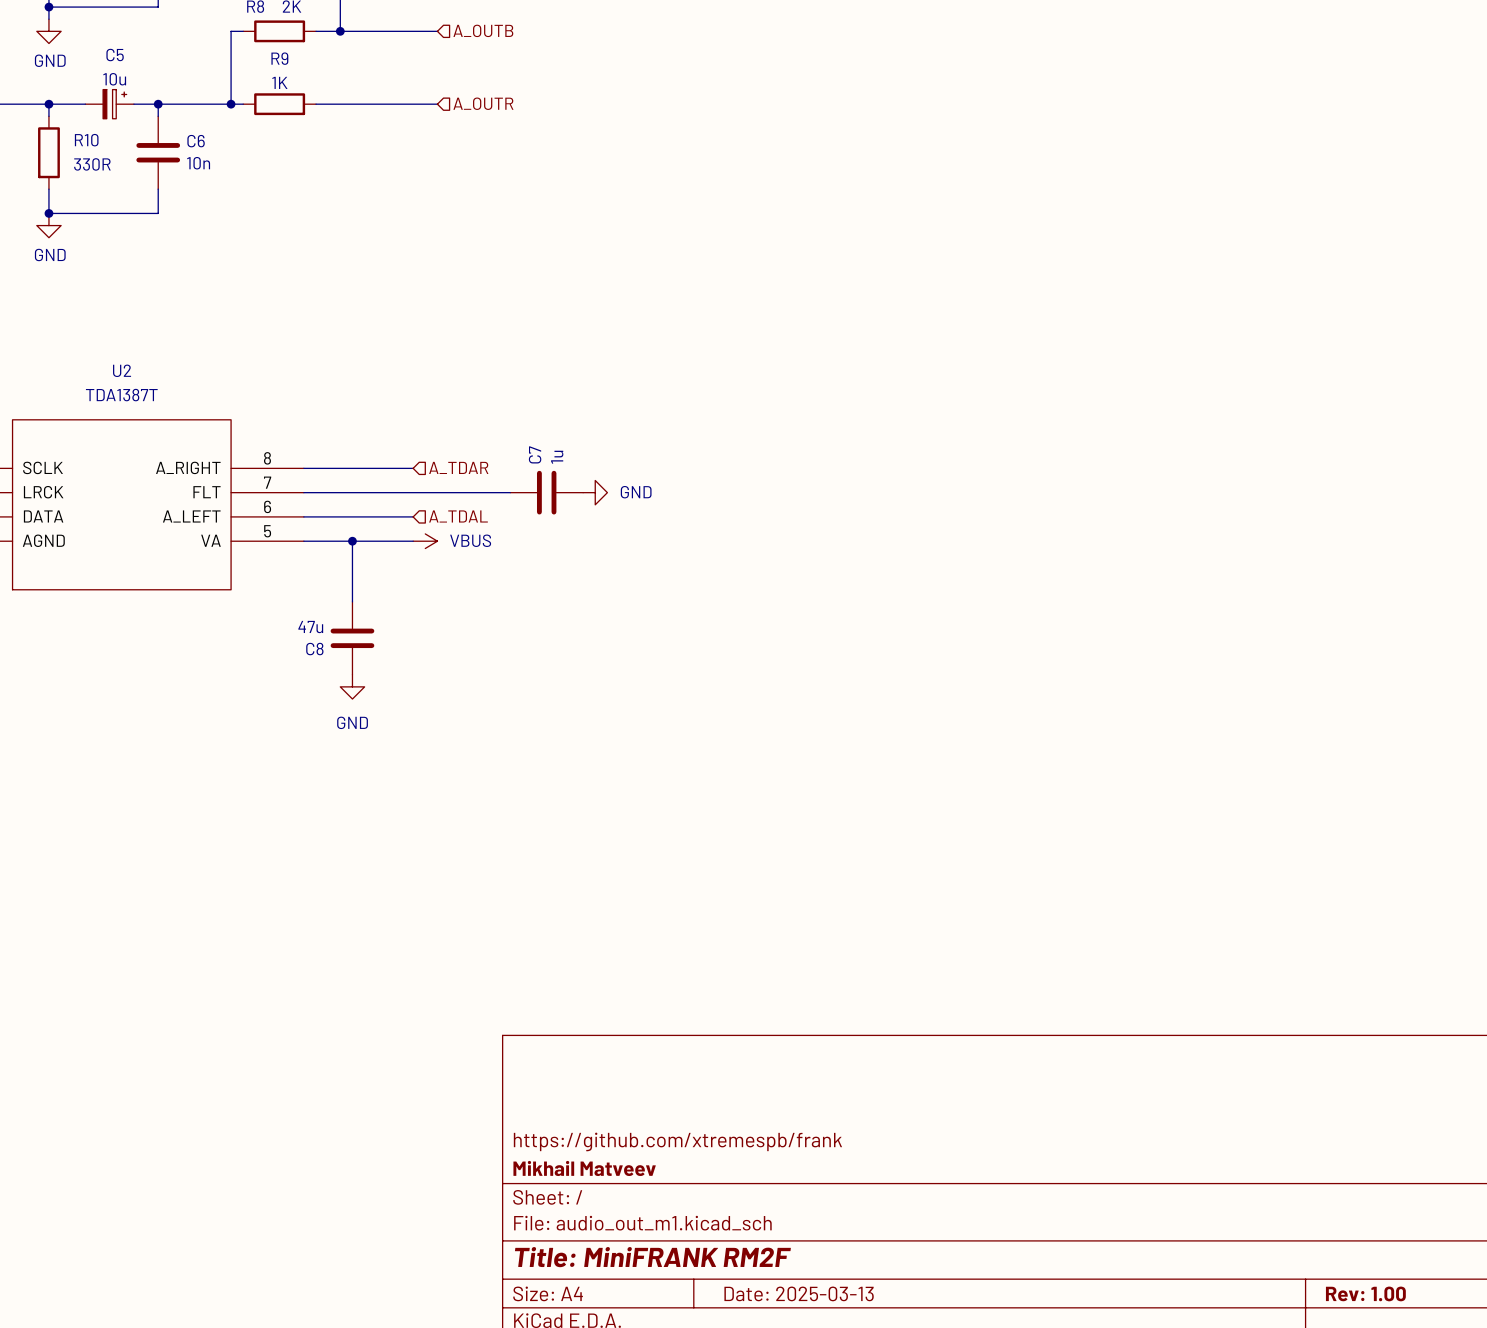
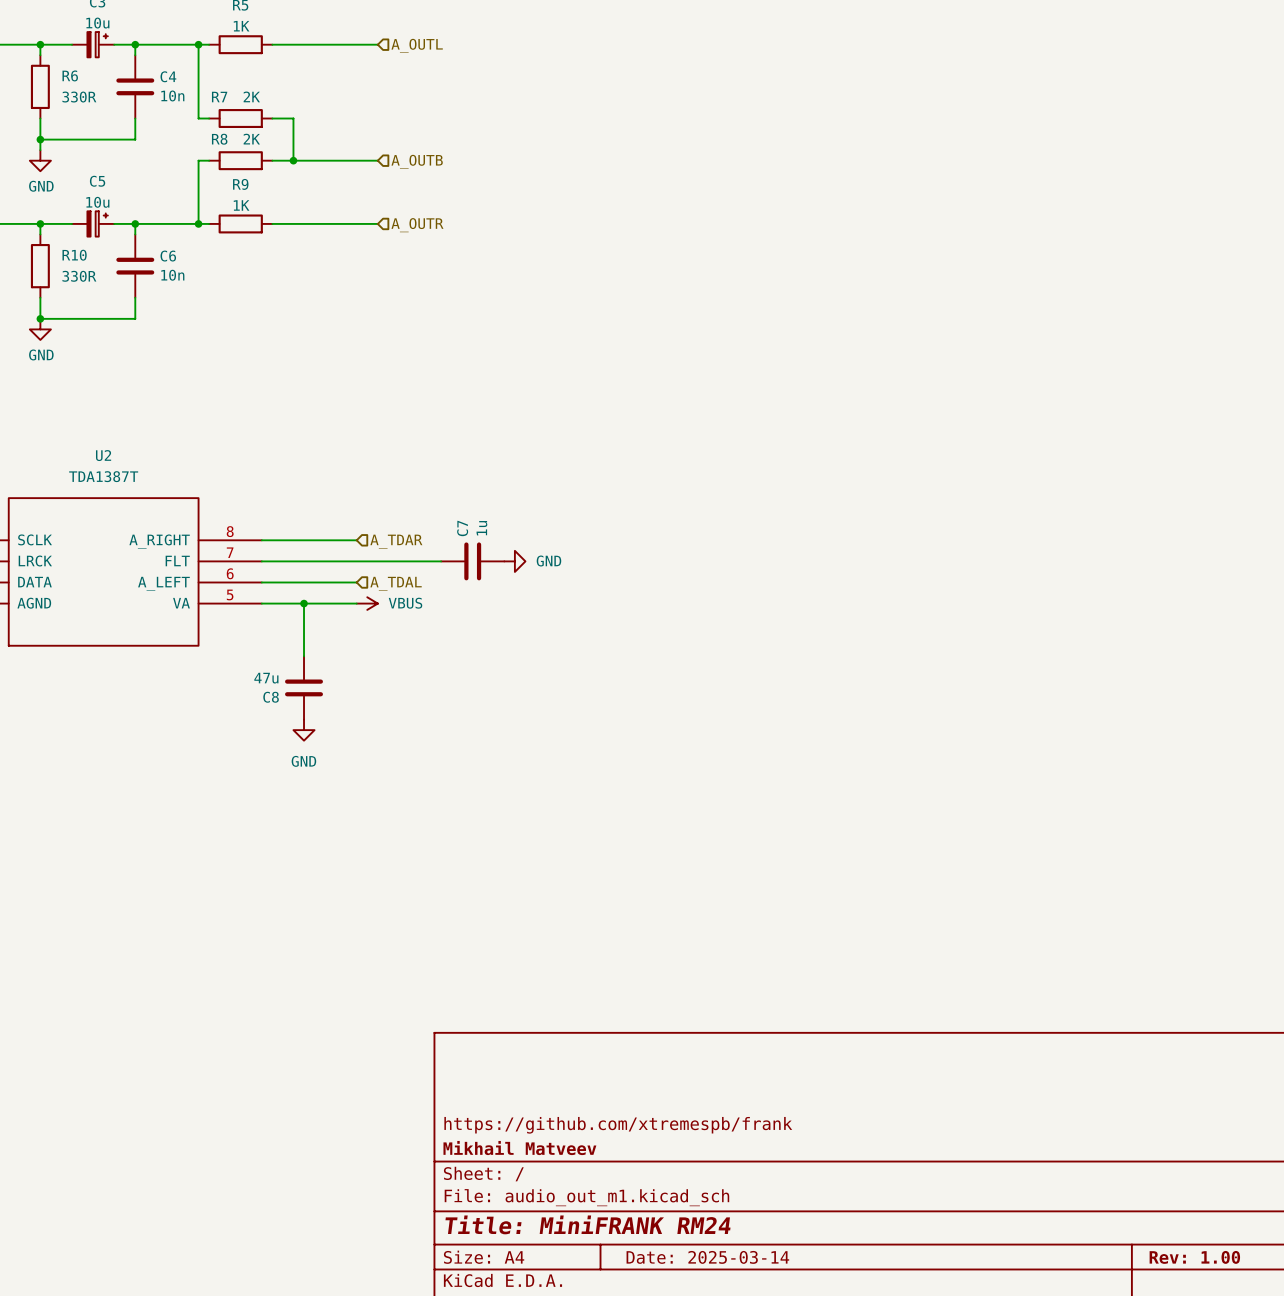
title block: Title: MiniFRANK RM2F (652, 1257) -> Title: MiniFRANK RM24 (587, 1224)
title block: Date: 2025-03-13 (799, 1293) -> Date: 2025-03-14 (707, 1257)

